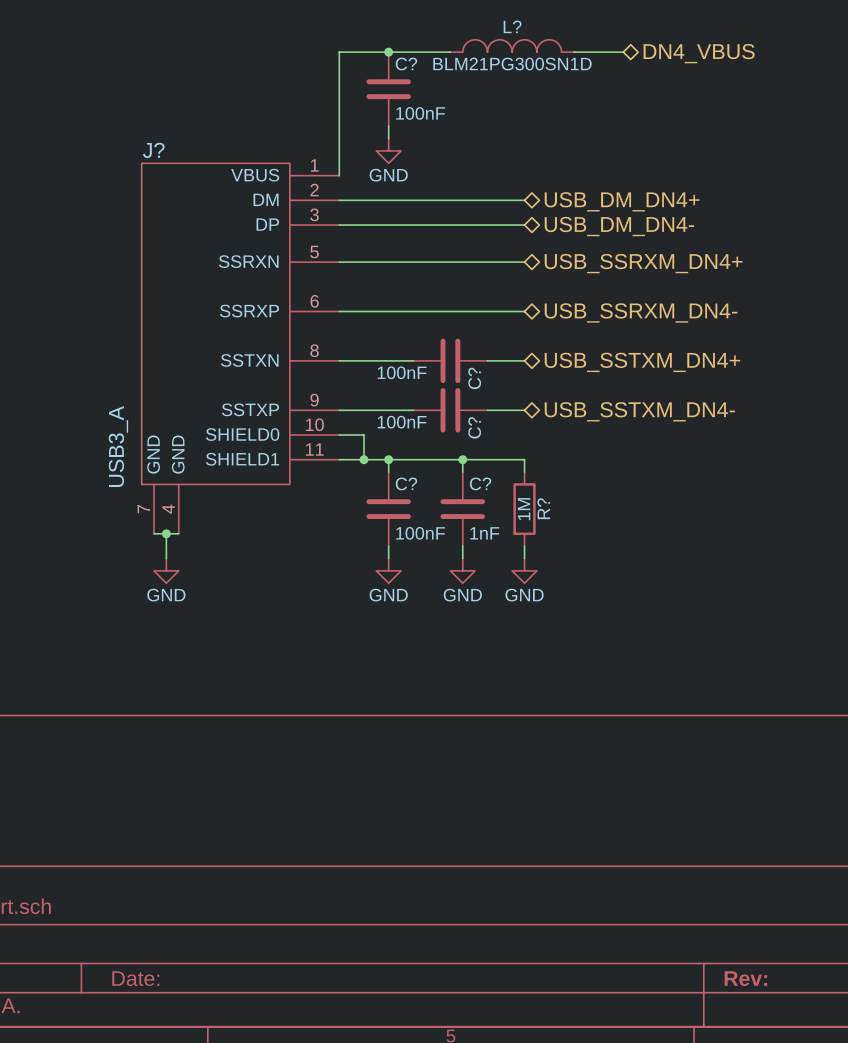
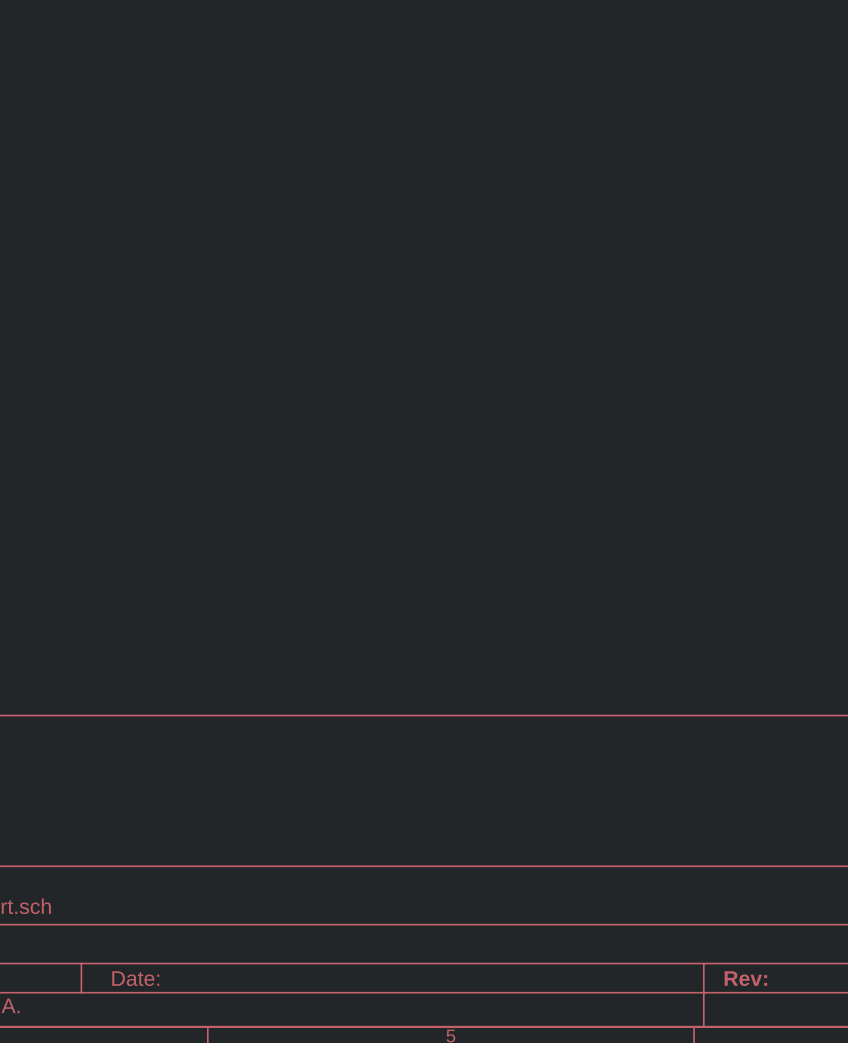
L?: BLM21PG300SN1D (512, 45) -> none
junction: (388, 52) -> none
wire: (450, 52) (339, 52) (339, 175) -> none
wire: (573, 52) (623, 52) -> none
hierarchical label: DN4_VBUS (699, 53) -> none
C?: 100nF (388, 89) -> none
wire: (388, 126) (388, 138) -> none
power symbol: GND (388, 150) -> none
wire: (339, 200) (524, 200) -> none
hierarchical label: USB_DM_DN4+ (622, 201) -> none
wire: (339, 225) (524, 225) -> none
hierarchical label: USB_DM_DN4- (619, 226) -> none
wire: (339, 262) (524, 262) -> none
hierarchical label: USB_SSRXM_DN4+ (643, 263) -> none
wire: (339, 311) (524, 311) -> none
hierarchical label: USB_SSRXM_DN4- (640, 312) -> none
J?: USB3_A (240, 348) -> none
wire: (339, 360) (413, 360) -> none
C?: 100nF (450, 360) -> none
wire: (487, 360) (524, 360) -> none
hierarchical label: USB_SSTXM_DN4+ (642, 362) -> none
wire: (339, 410) (413, 410) -> none
C?: 100nF (450, 410) -> none
wire: (487, 410) (524, 410) -> none
hierarchical label: USB_SSTXM_DN4- (639, 411) -> none
wire: (339, 435) (363, 435) (363, 459) -> none
wire: (339, 459) (524, 459) (524, 472) -> none
junction: (363, 459) -> none
wire: (388, 459) (388, 472) -> none
junction: (388, 459) -> none
wire: (462, 459) (462, 472) -> none
junction: (462, 459) -> none
C?: 100nF (388, 509) -> none
C?: 1nF (462, 509) -> none
R?: 1M (524, 509) -> none
wire: (154, 533) (178, 533) -> none
wire: (166, 533) (166, 558) -> none
junction: (166, 533) -> none
wire: (388, 546) (388, 558) -> none
wire: (462, 546) (462, 558) -> none
wire: (524, 546) (524, 558) -> none
power symbol: GND (166, 570) -> none
power symbol: GND (388, 570) -> none
power symbol: GND (462, 570) -> none
power symbol: GND (524, 570) -> none

